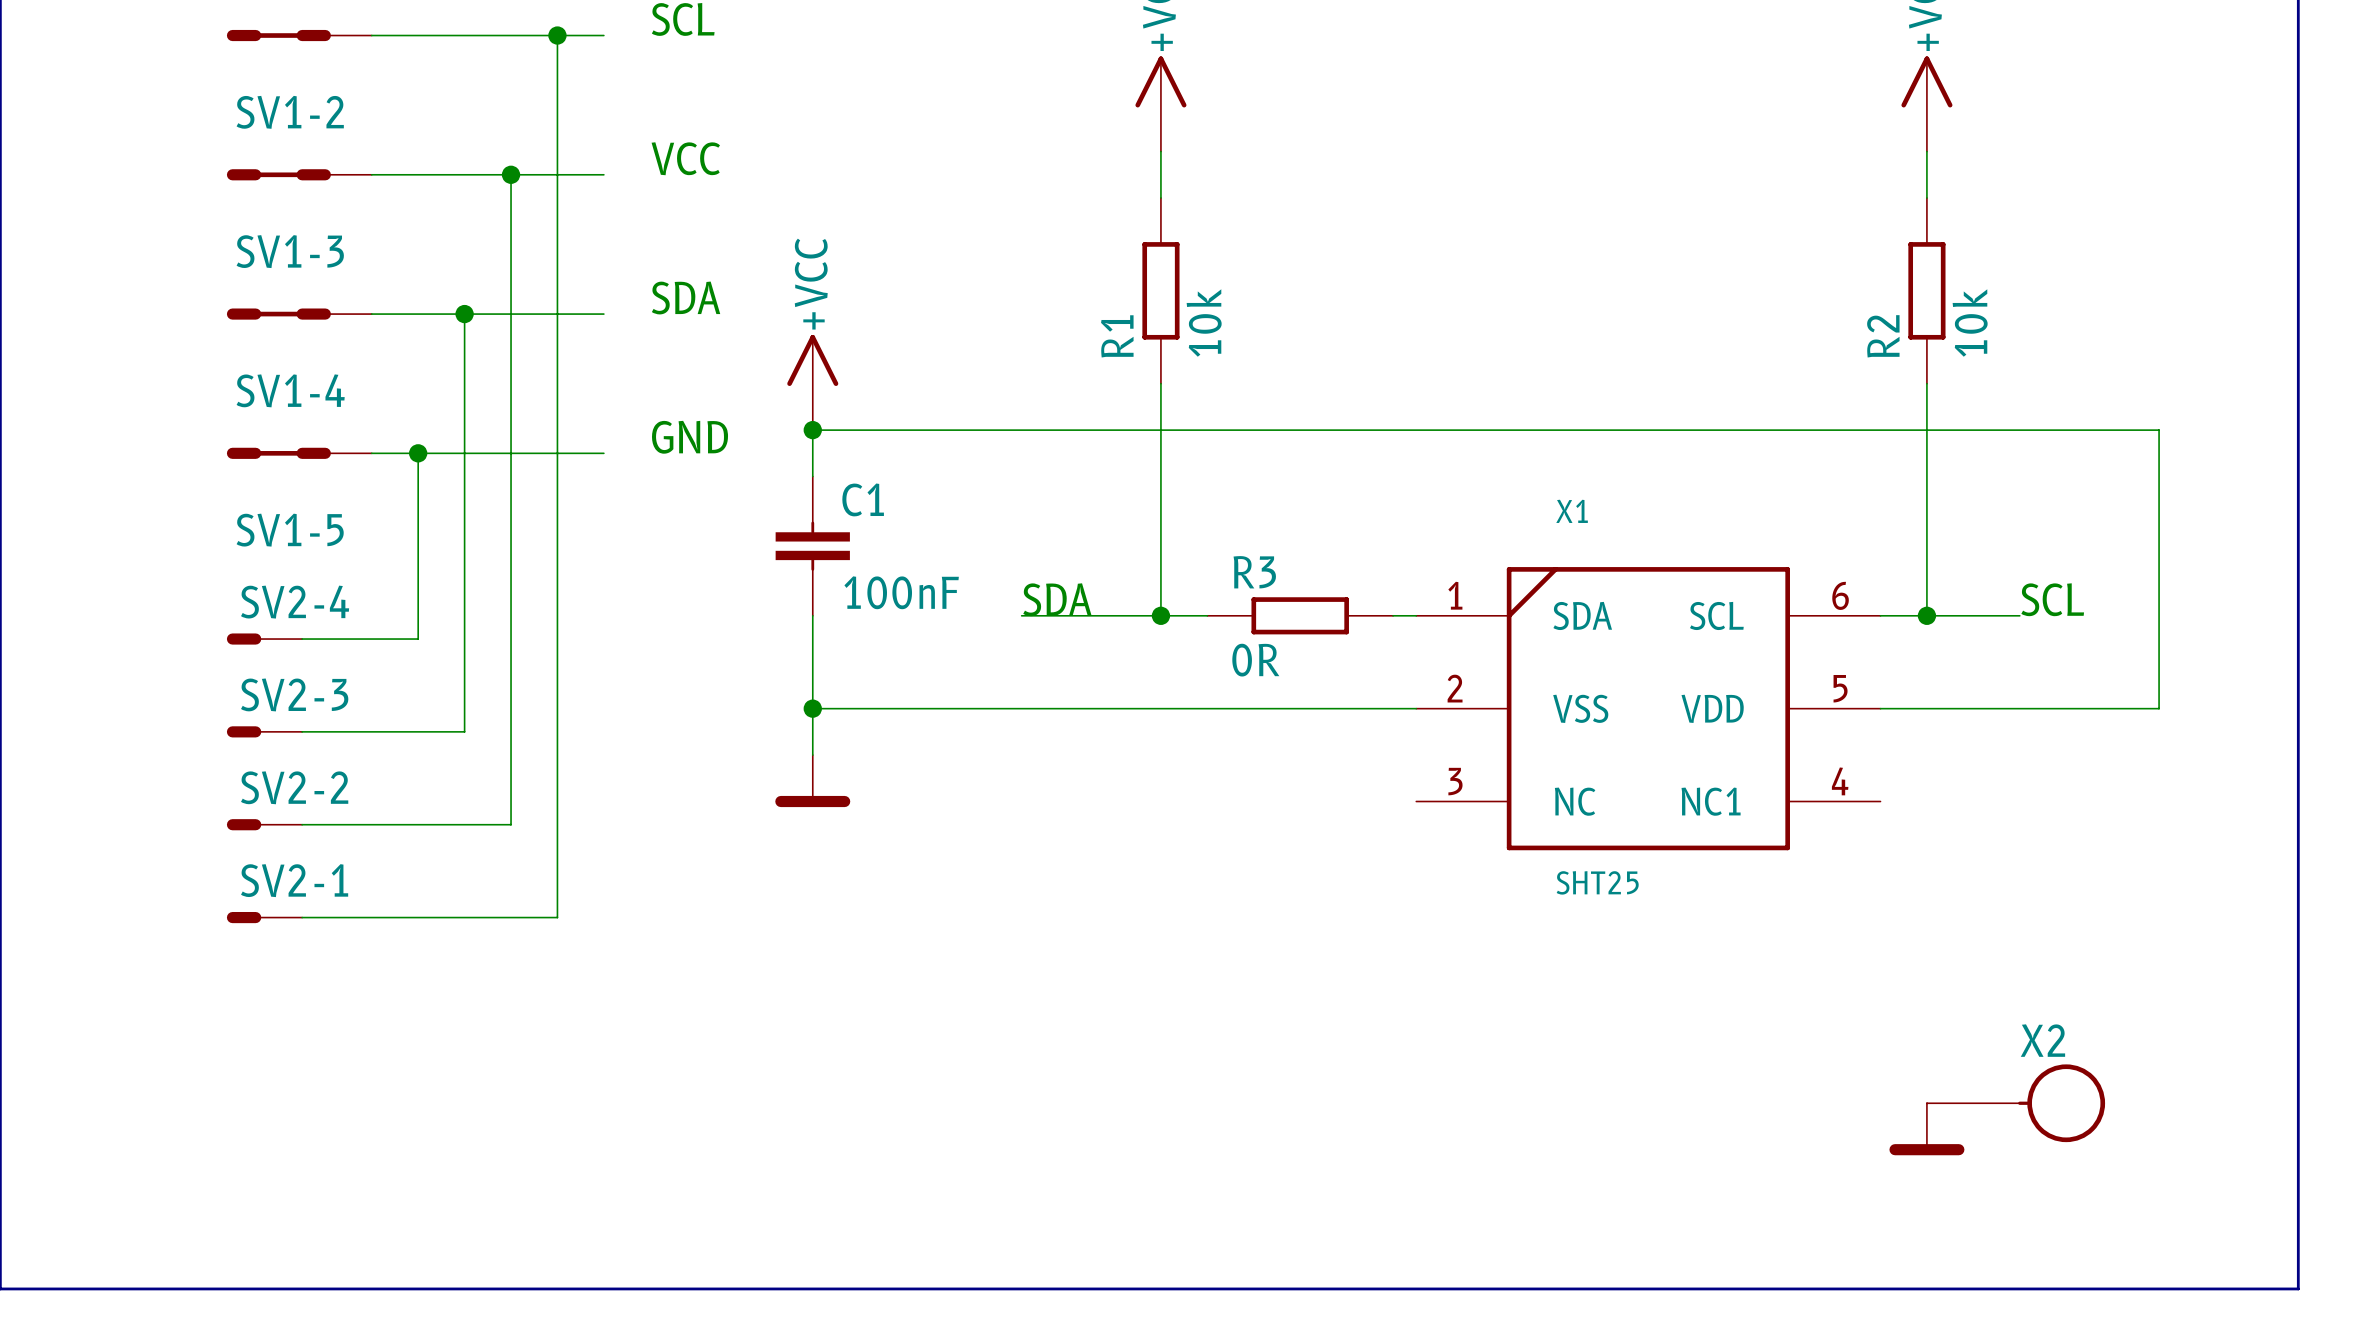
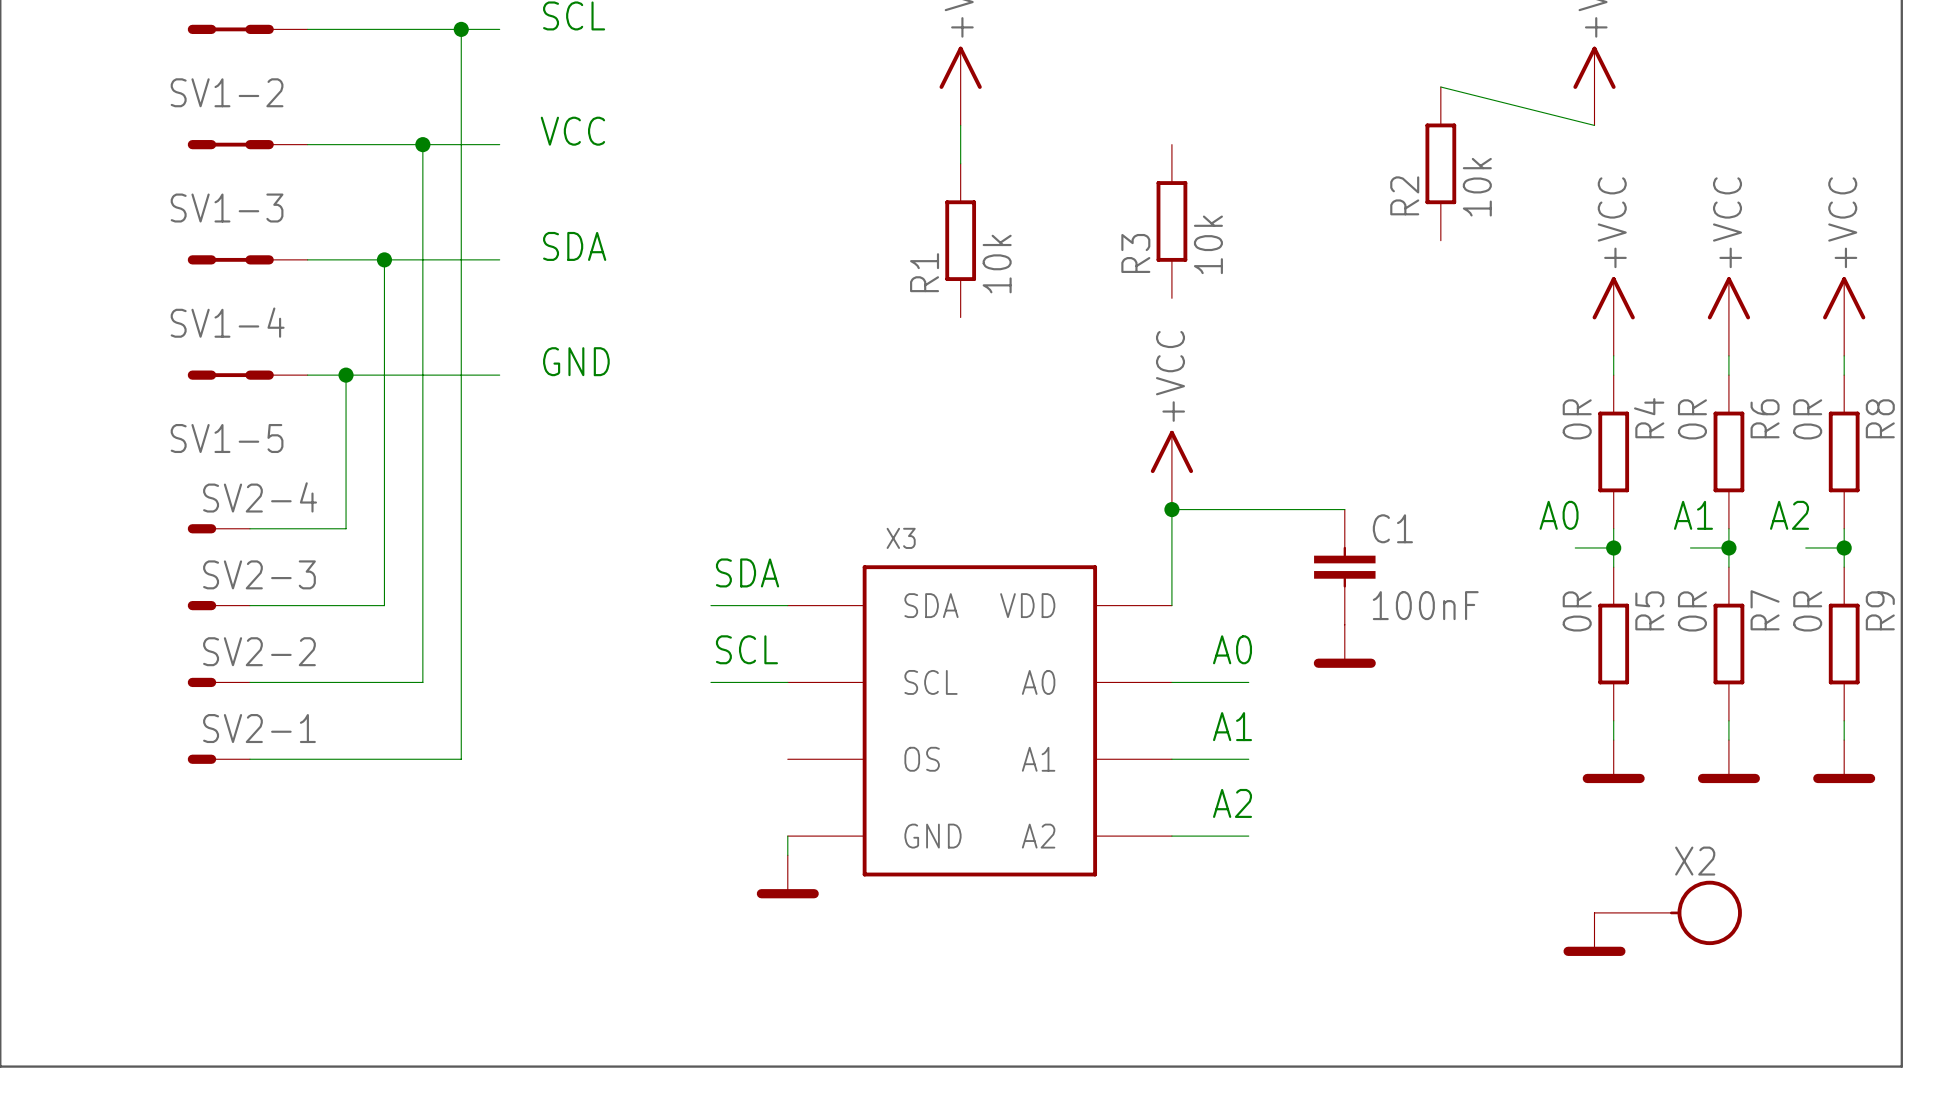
wire: (1926, 151) (1926, 198) -> (1594, 125) (1440, 87)
R2 position: (1926, 290) -> (1440, 163)
power symbol: +VCC (812, 382) -> none
power symbol: none -> +VCC (1613, 316)
power symbol: none -> +VCC (1728, 316)
power symbol: none -> +VCC (1844, 316)
wire: (1160, 383) (1160, 615) -> none
wire: (1926, 383) (1926, 615) -> none
junction: (812, 430) -> none
wire: none -> (1613, 355) (1613, 375)
wire: none -> (1728, 355) (1728, 375)
wire: none -> (1844, 355) (1844, 375)
wire: (812, 476) (812, 430) (2159, 430) (2159, 708) (1880, 708) -> none
C1 position: (812, 546) -> (1344, 567)
R4: none -> 0R (1613, 451)
R6: none -> 0R (1728, 451)
R8: none -> 0R (1844, 451)
power symbol: none -> +VCC (1171, 470)
R3 name position: R3 (1254, 572) -> R3 (1135, 253)
text position: SDA (1057, 599) -> SDA (747, 572)
text: SCL (2052, 599) -> none
wire: (812, 615) (812, 755) -> none
wire: (1021, 615) (1207, 615) -> none
junction: (1160, 615) -> none
R3 rotation: 0° (1300, 615) -> 90° clockwise (1171, 221)
R3 position: (1300, 615) -> (1171, 221)
wire: (1393, 615) (1416, 615) -> none
junction: none -> (1171, 509)
wire: none -> (1344, 509) (1171, 509) (1171, 605)
wire: (1880, 615) (2019, 615) -> none
junction position: (1926, 615) -> (1613, 547)
text: none -> A0 (1559, 515)
text: none -> A1 (1693, 515)
text: none -> A2 (1789, 515)
wire: none -> (1613, 528) (1613, 567)
wire: none -> (1728, 528) (1728, 567)
wire: none -> (1844, 528) (1844, 567)
R3 value: 0R (1255, 660) -> 10k (1208, 244)
wire: none -> (1575, 547) (1613, 547)
wire: none -> (1690, 547) (1728, 547)
junction: none -> (1728, 547)
wire: none -> (1805, 547) (1844, 547)
junction: none -> (1844, 547)
wire: (812, 708) (1416, 708) -> none
junction: (812, 708) -> none
X1: SHT25 (1648, 708) -> none
wire: none -> (710, 605) (787, 605)
R5: none -> 0R (1613, 644)
R7: none -> 0R (1728, 644)
R9: none -> 0R (1844, 644)
power symbol position: (812, 781) -> (787, 876)
power symbol: none -> (1344, 646)
text: none -> SCL (746, 649)
text: none -> A0 (1232, 649)
wire: none -> (710, 682) (787, 682)
wire: none -> (1171, 682) (1248, 682)
X3: none -> (979, 720)
wire: none -> (1613, 720) (1613, 740)
wire: none -> (1728, 720) (1728, 740)
wire: none -> (1844, 720) (1844, 740)
text: none -> A1 (1232, 726)
wire: none -> (1171, 759) (1248, 759)
power symbol: none -> (1613, 761)
power symbol: none -> (1728, 761)
power symbol: none -> (1844, 761)
text: none -> A2 (1232, 803)
wire: none -> (787, 836) (787, 855)
wire: none -> (1171, 836) (1248, 836)

